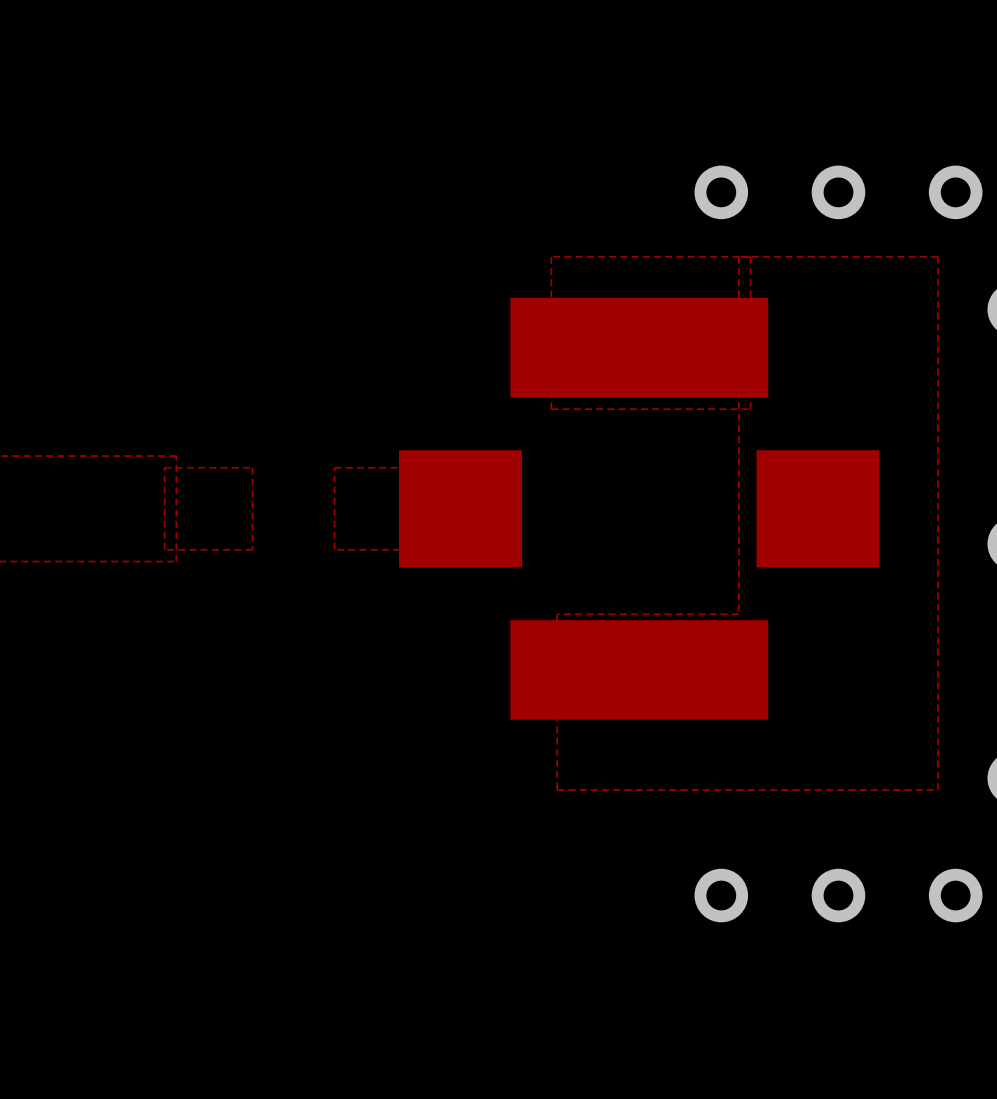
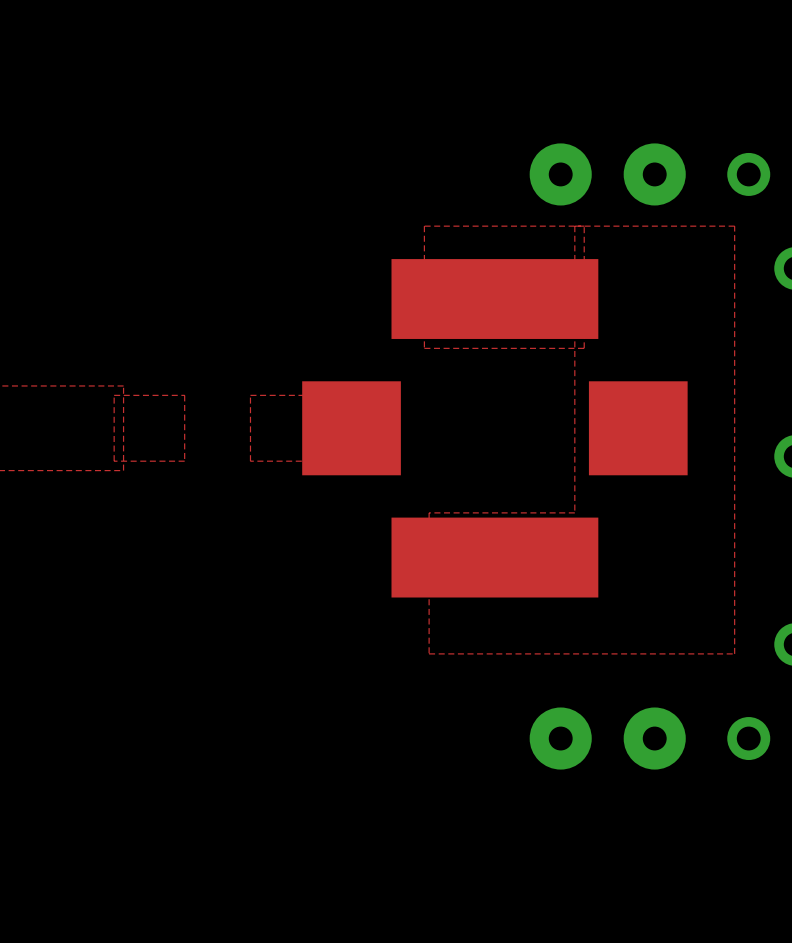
via size: [694, 165, 749, 220] -> [529, 143, 592, 206]
via size: [811, 165, 866, 220] -> [623, 143, 686, 206]
via size: [694, 868, 749, 923] -> [529, 707, 592, 770]
via size: [811, 868, 866, 923] -> [623, 707, 686, 770]

